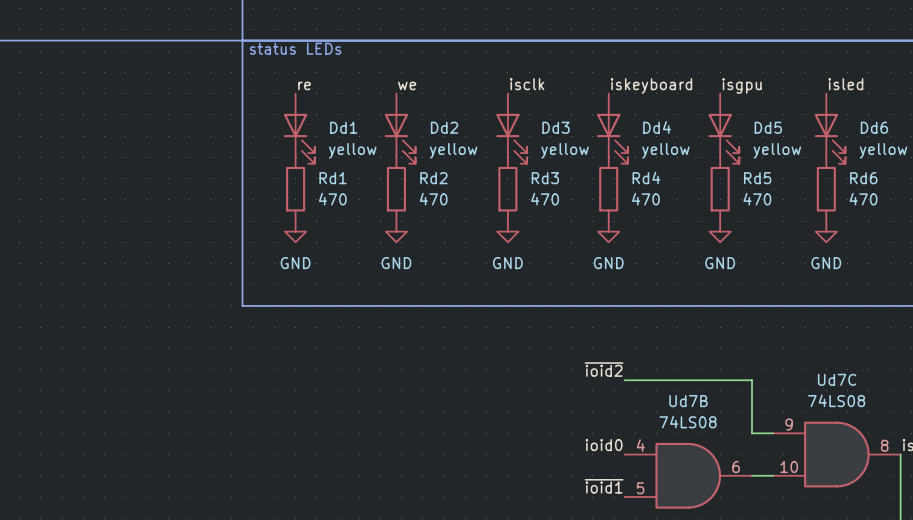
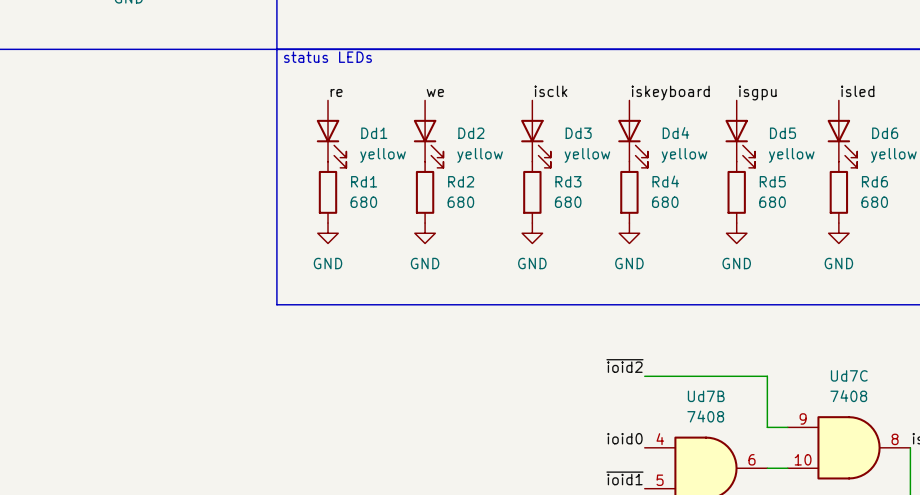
Rd1 value: 470 (332, 199) -> 680 (363, 202)
Rd2 value: 470 (433, 199) -> 680 (460, 202)
Rd3 value: 470 (545, 199) -> 680 (568, 202)
Rd4 value: 470 (645, 199) -> 680 (665, 202)
Rd5 value: 470 (757, 199) -> 680 (772, 202)
Rd6 value: 470 (863, 199) -> 680 (874, 202)
Ud7C value: 74LS08 (836, 400) -> 7408 (848, 396)
Ud7B value: 74LS08 (688, 422) -> 7408 (705, 416)

